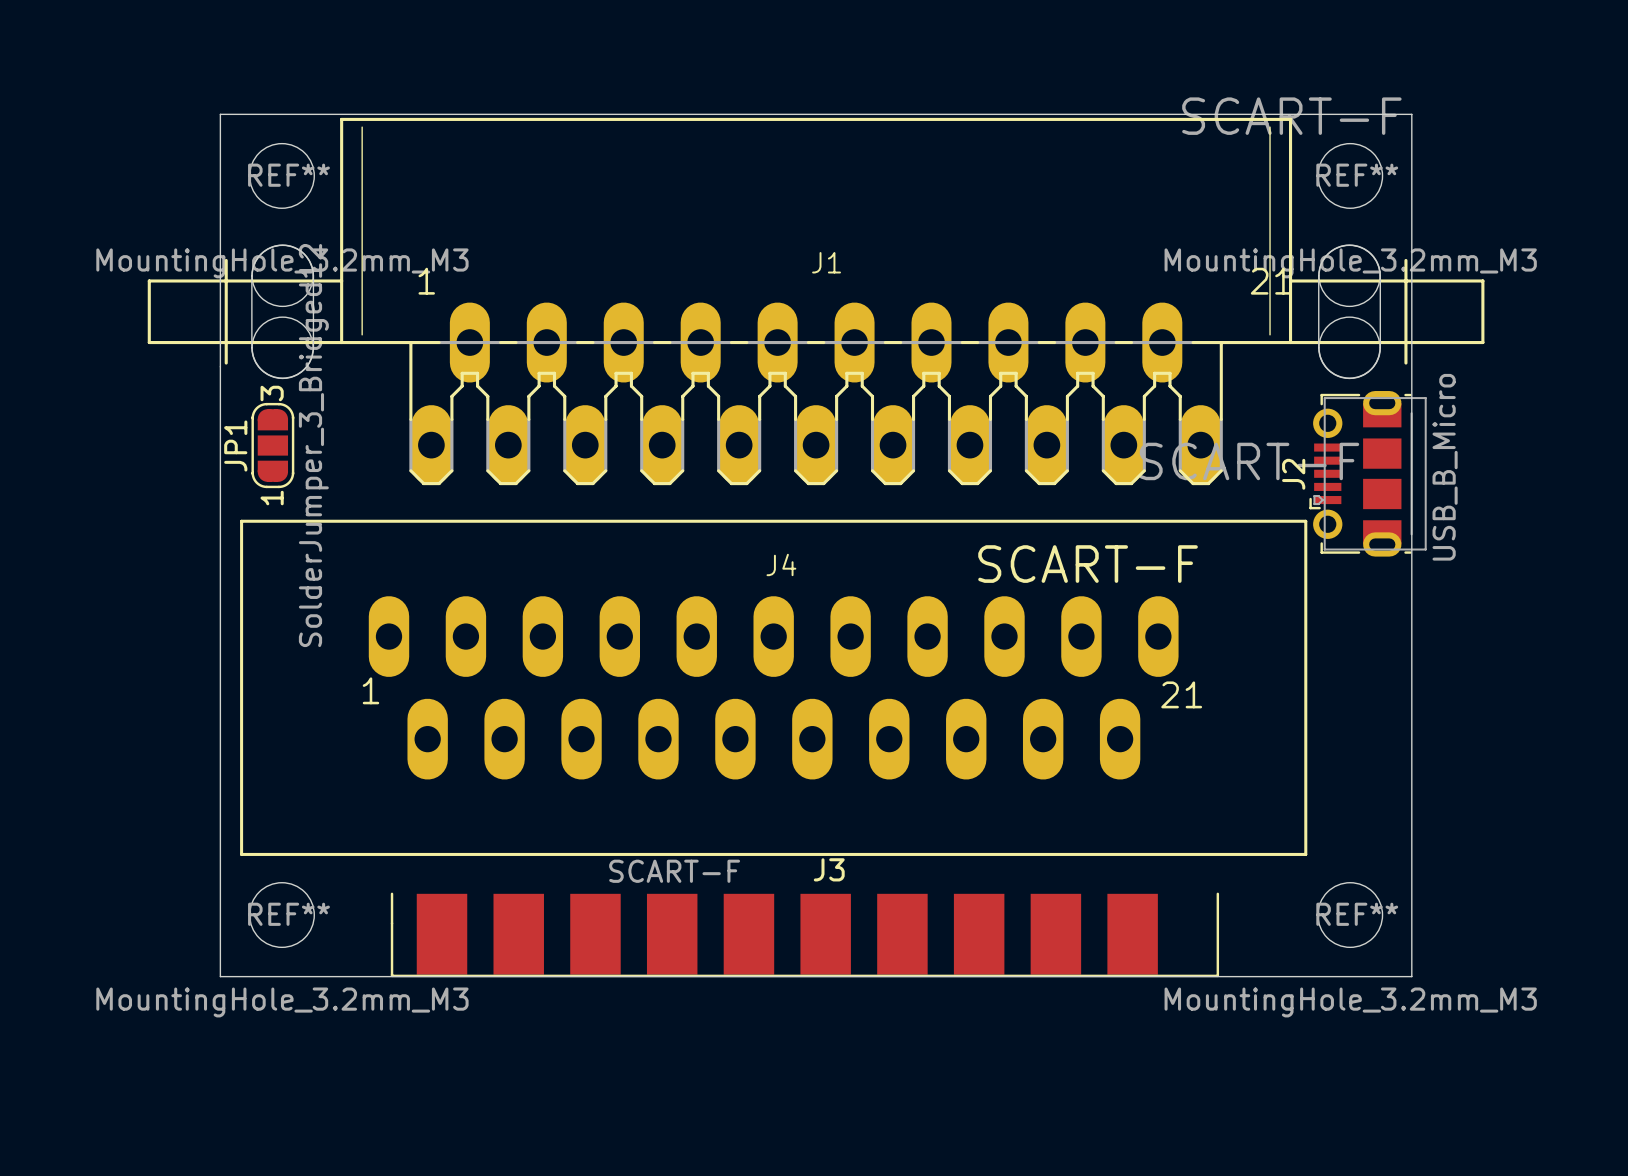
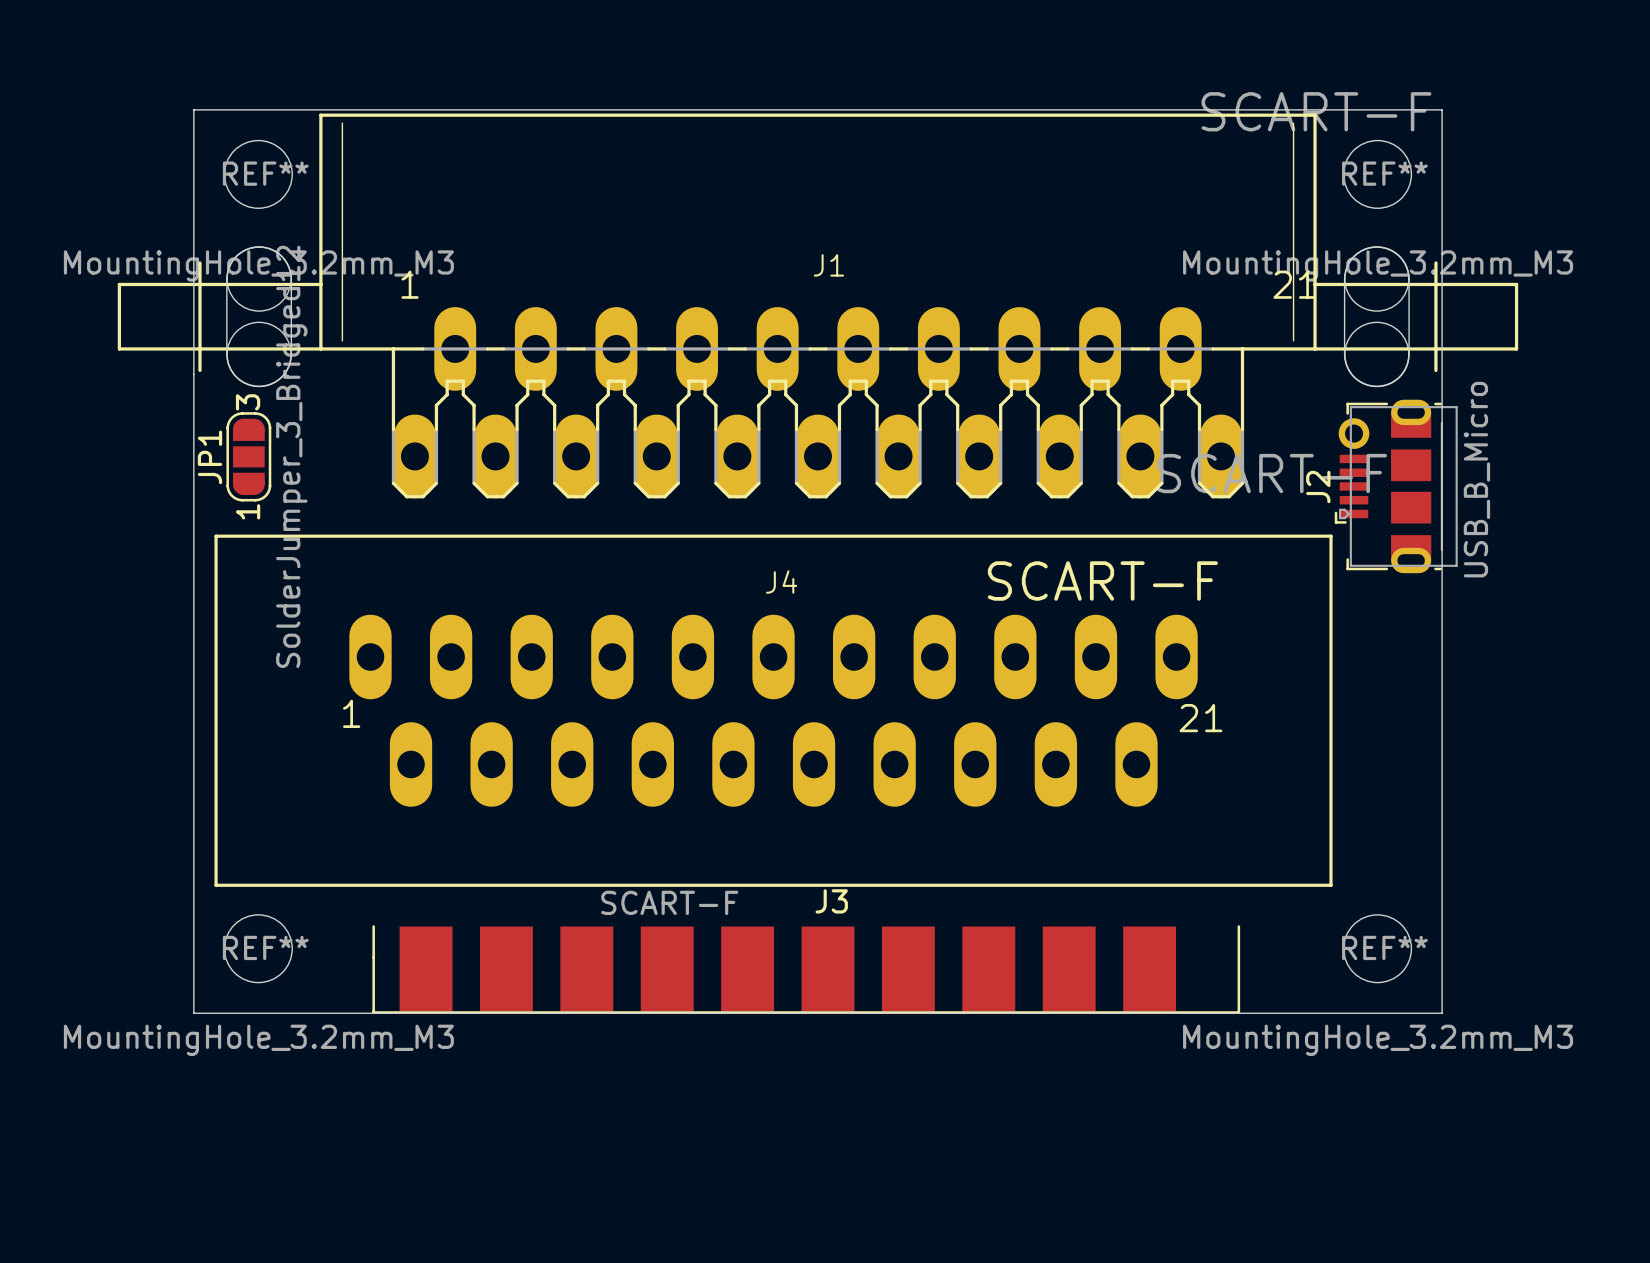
J2 footprint: [1309, 391, 1427, 557] -> [1334, 399, 1458, 574]

